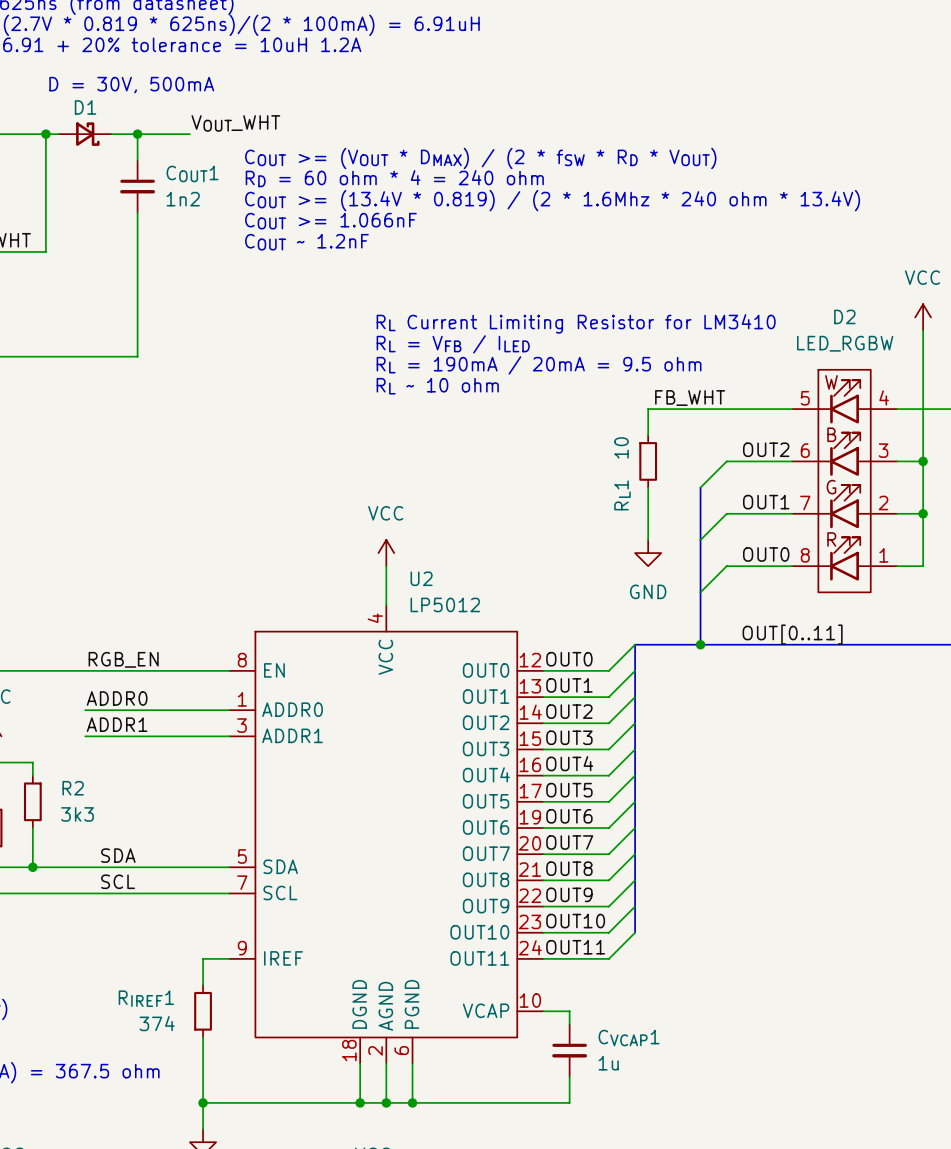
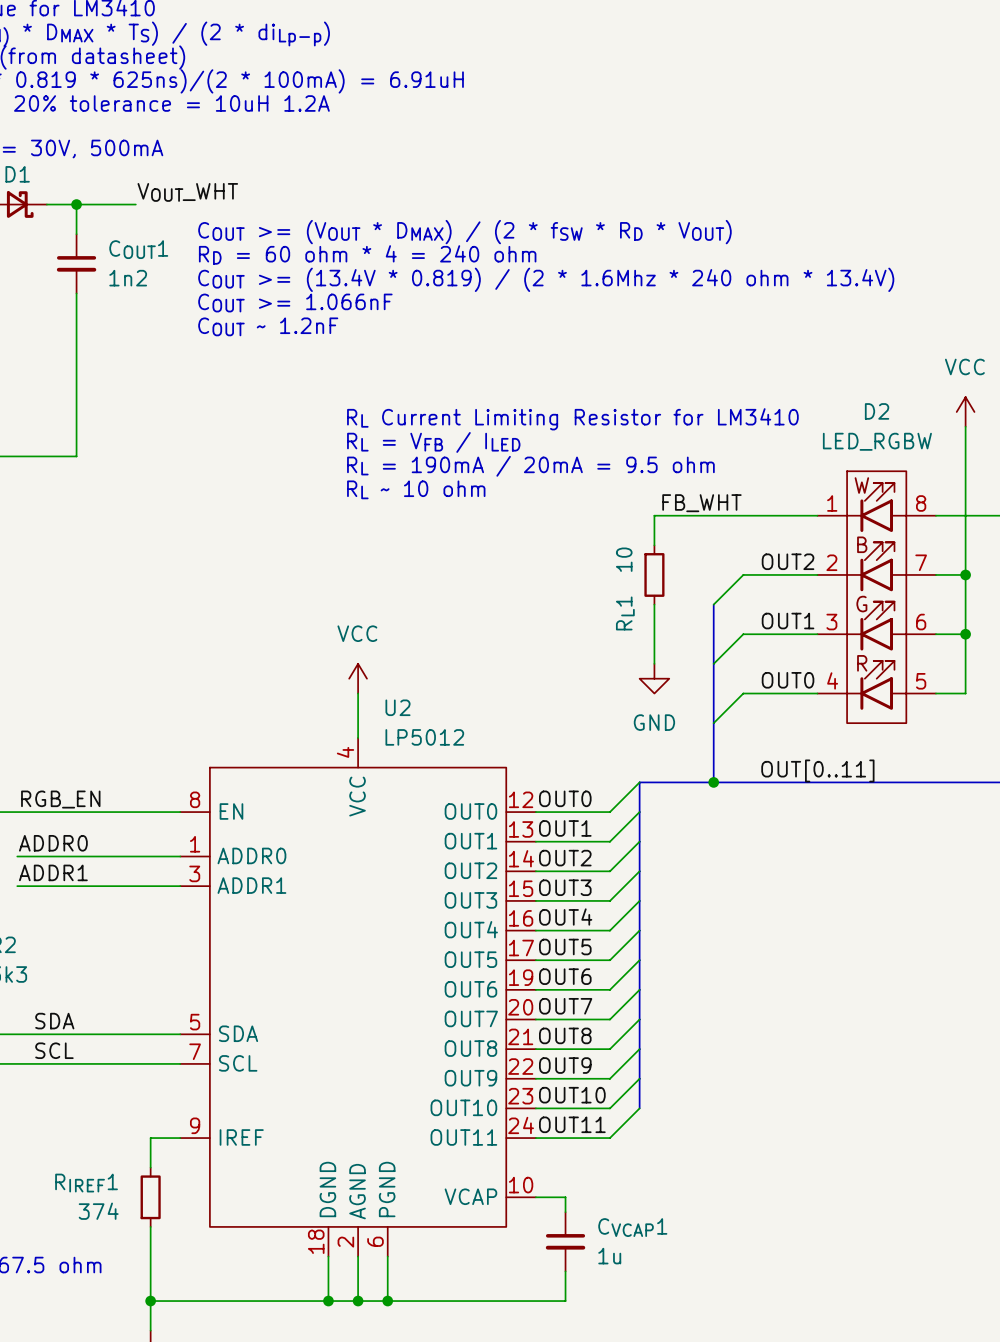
D2 pin number: 4 (884, 397) -> 8 (921, 503)
D2 pin number: 5 (805, 398) -> 1 (832, 503)
D2 pin number: 6 (805, 450) -> 2 (831, 562)
D2 pin number: 3 (883, 450) -> 7 (921, 562)
D2 pin number: 7 (805, 503) -> 3 (831, 622)
D2 pin number: 2 (883, 503) -> 6 (921, 622)
D2 pin number: 8 (805, 555) -> 4 (832, 680)
D2 pin number: 1 (883, 555) -> 5 (921, 681)

